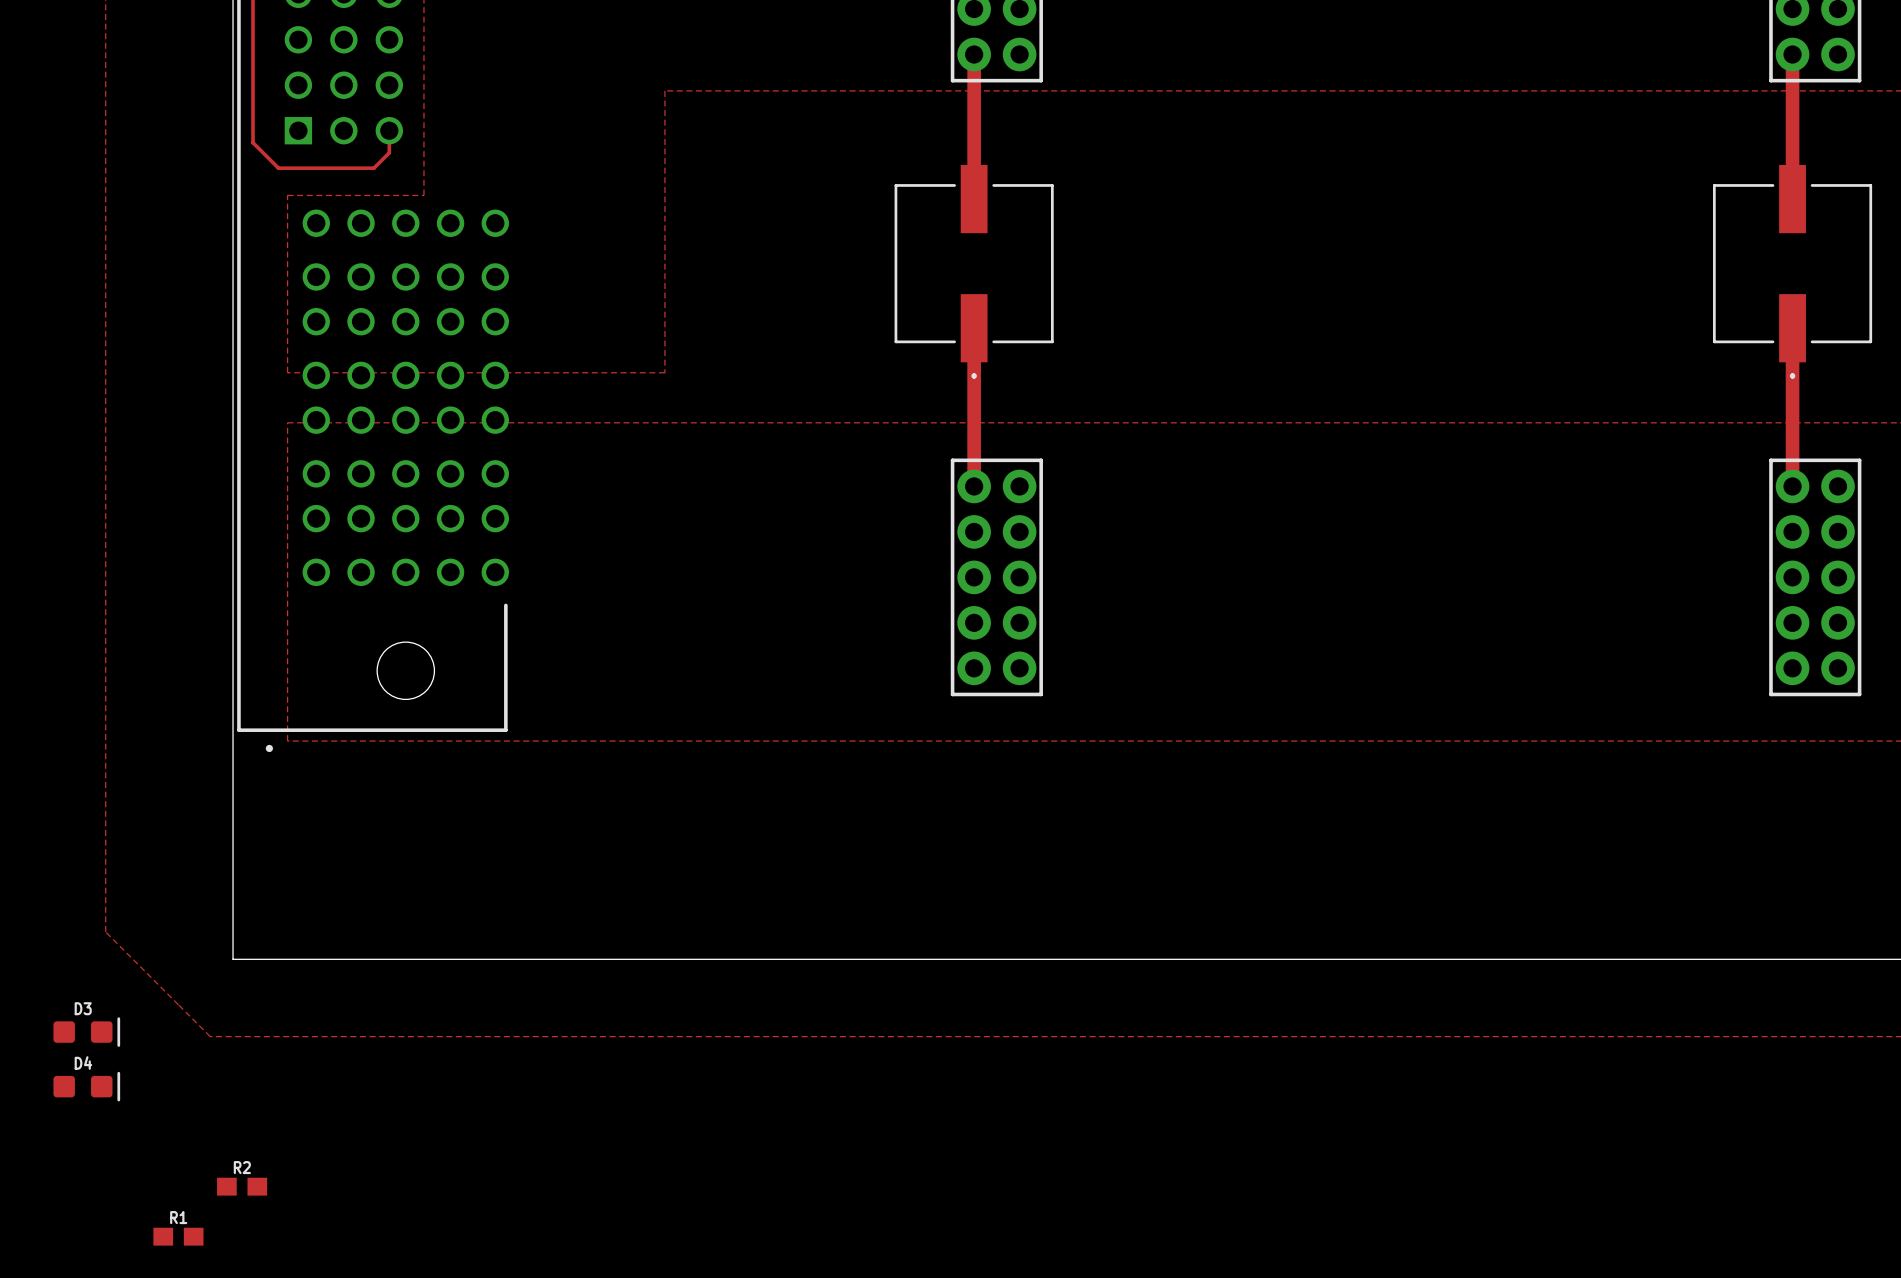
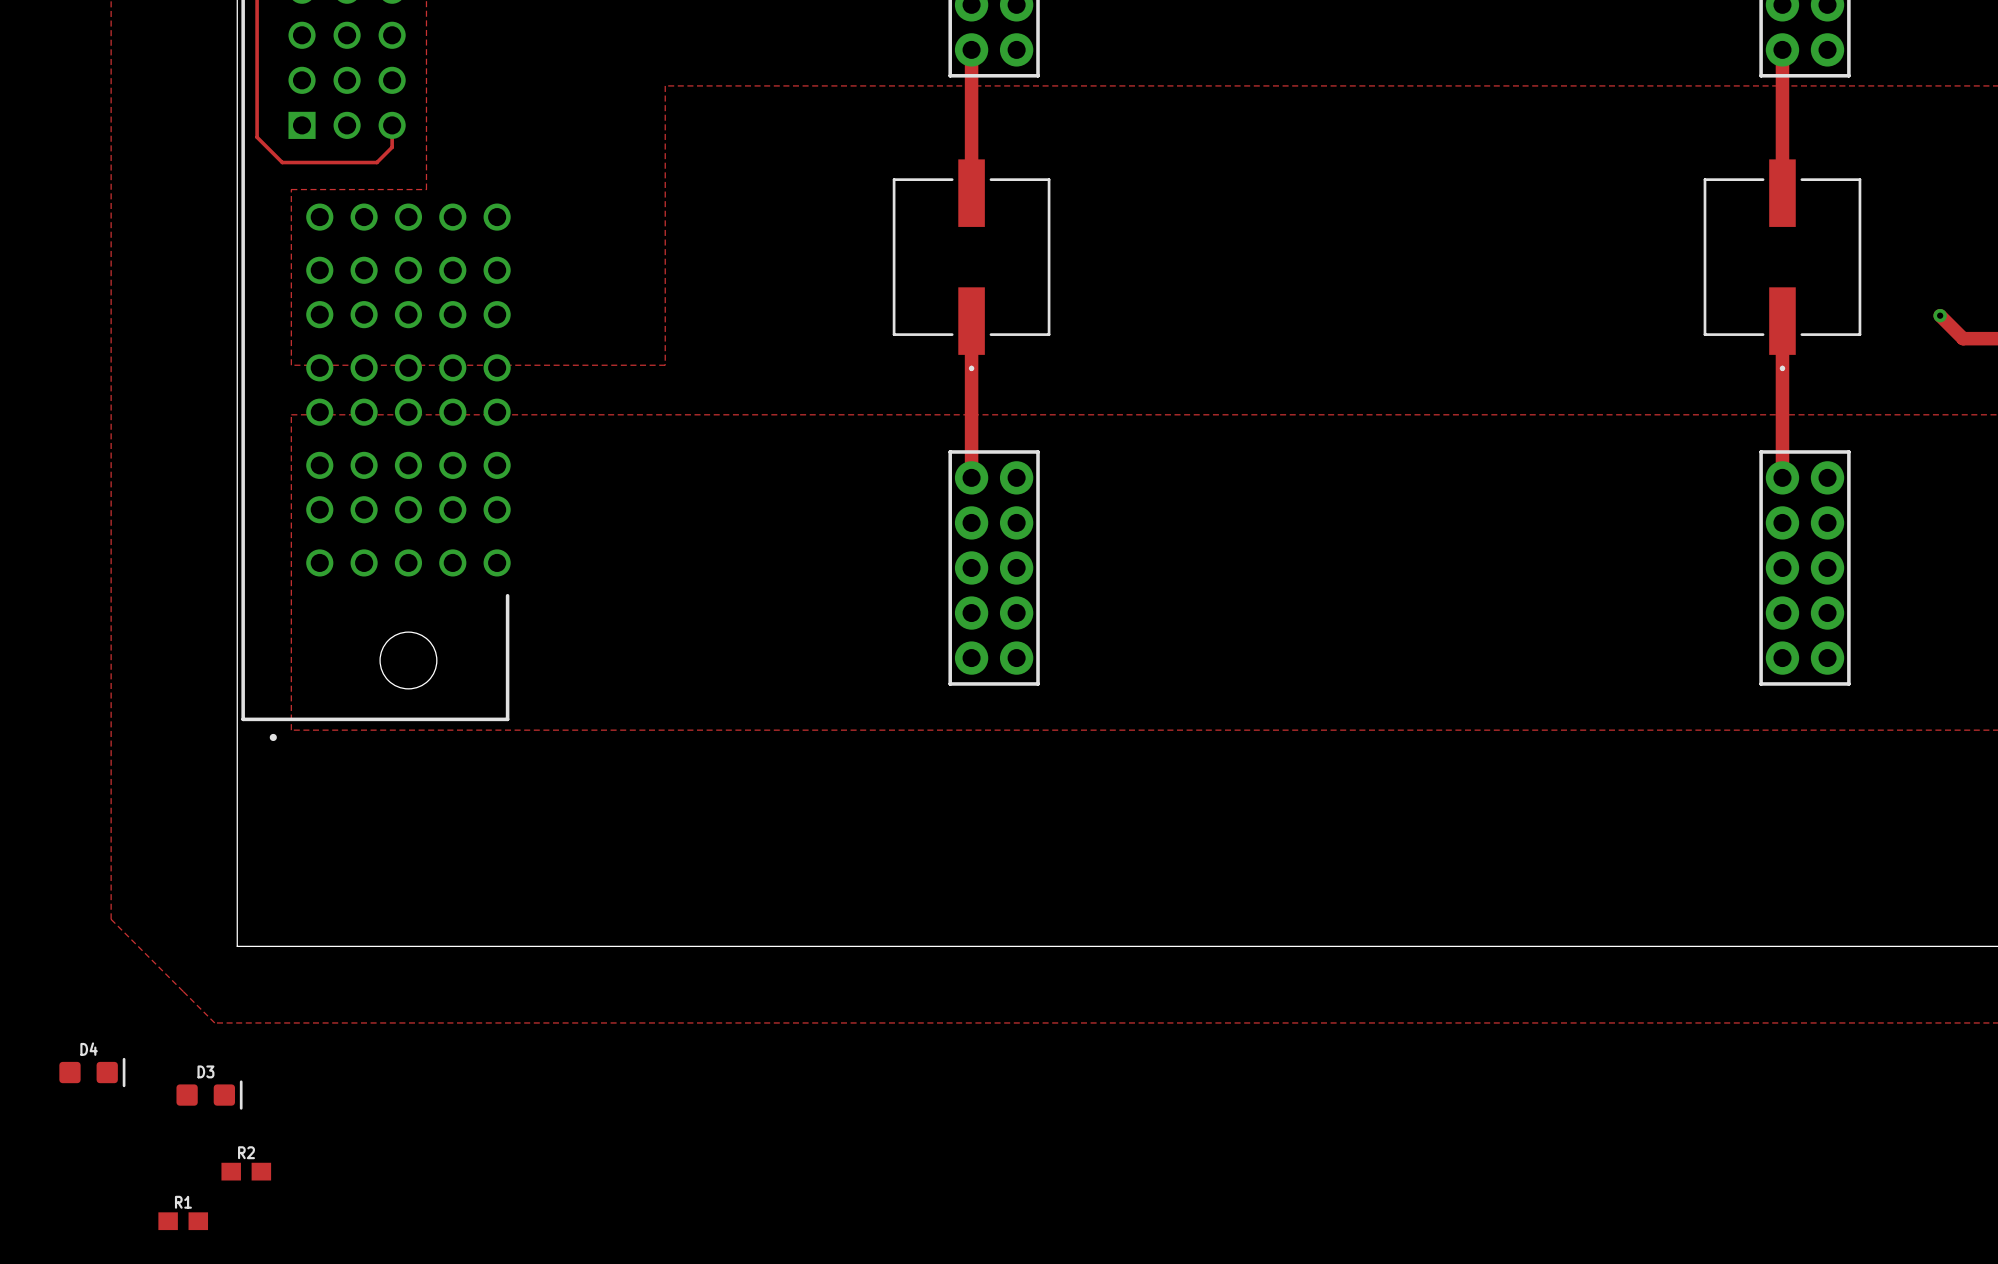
D3 position: (86, 1032) -> (209, 1095)

